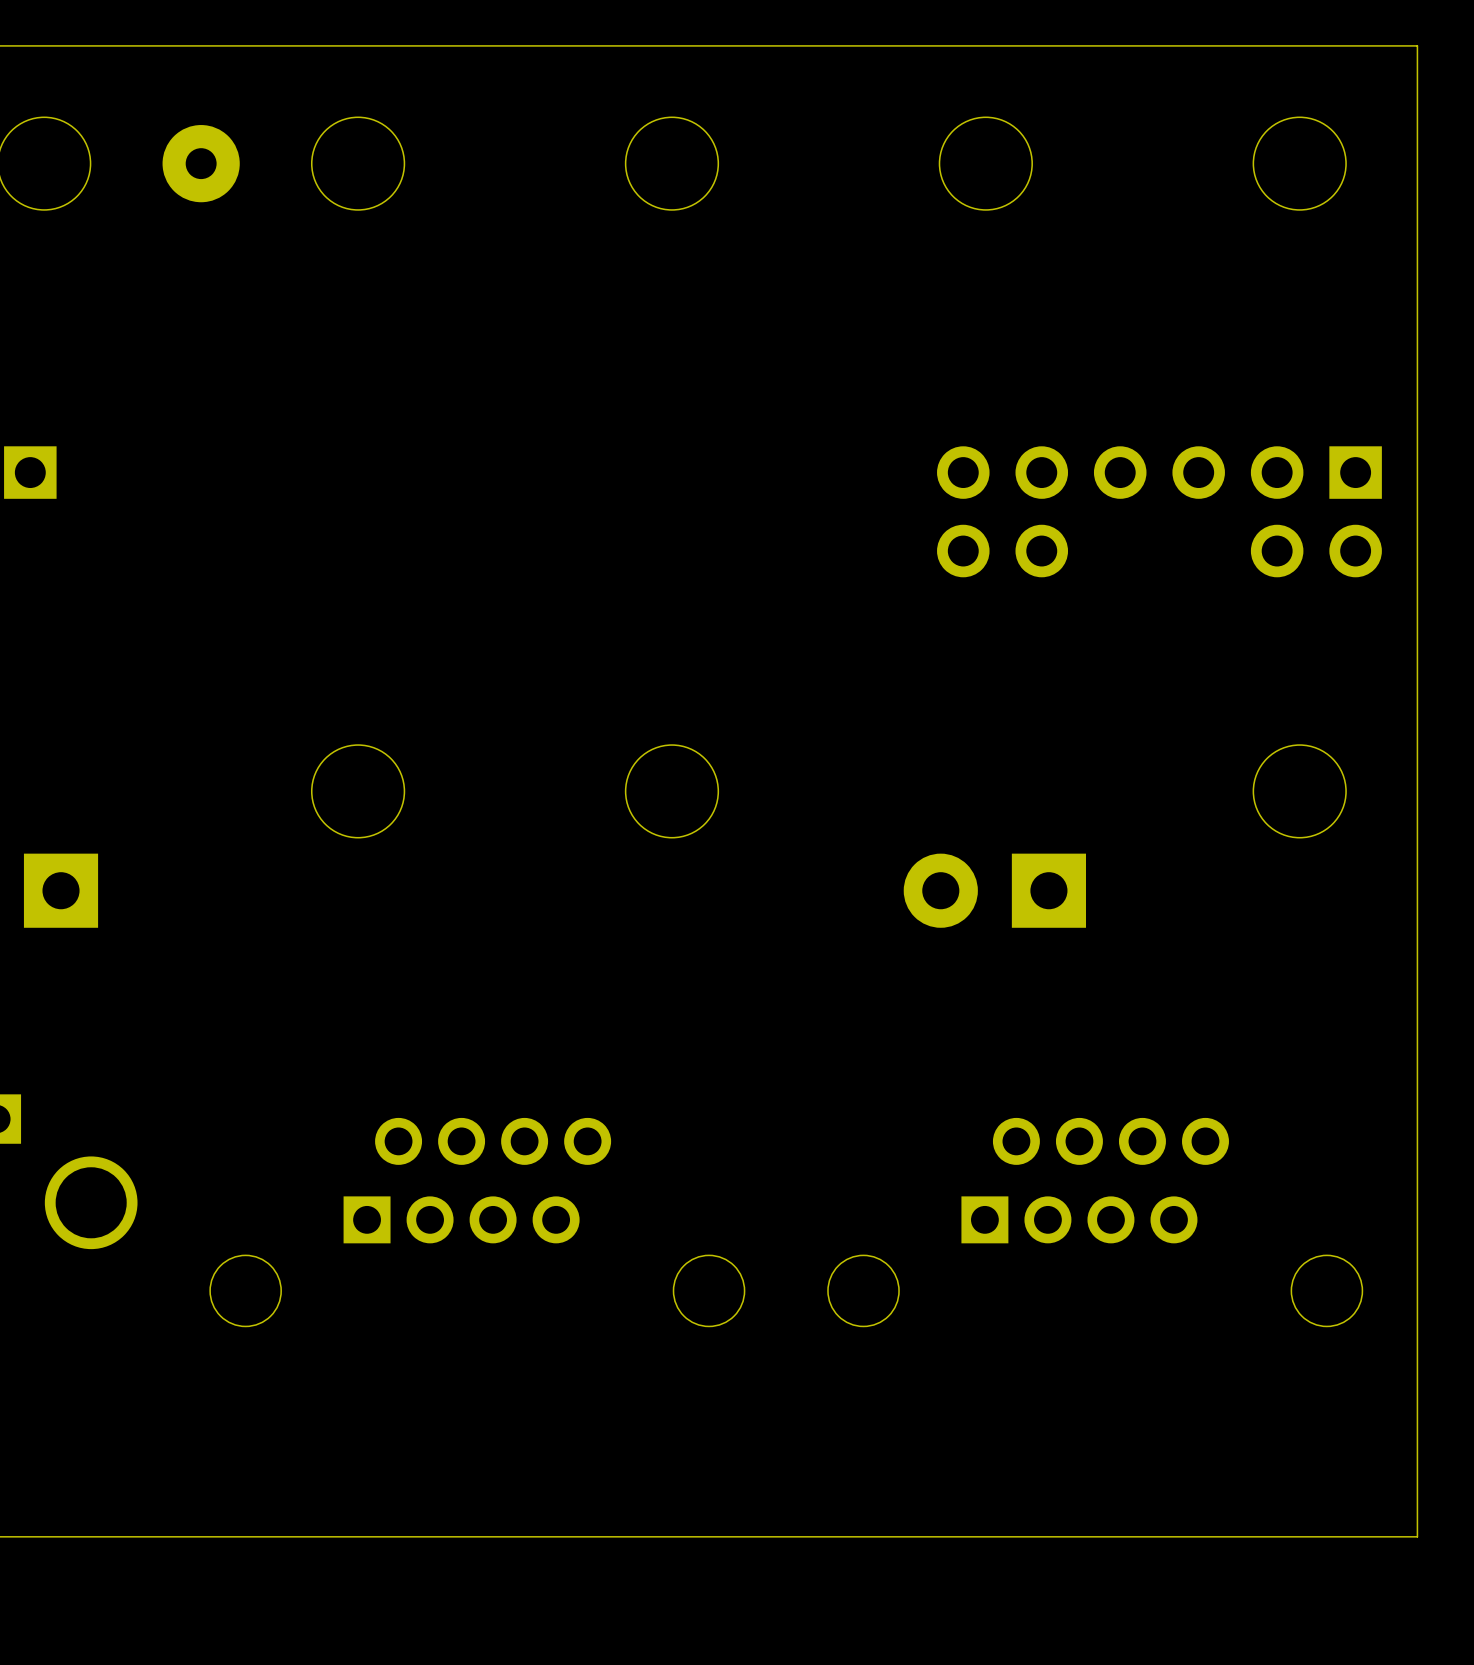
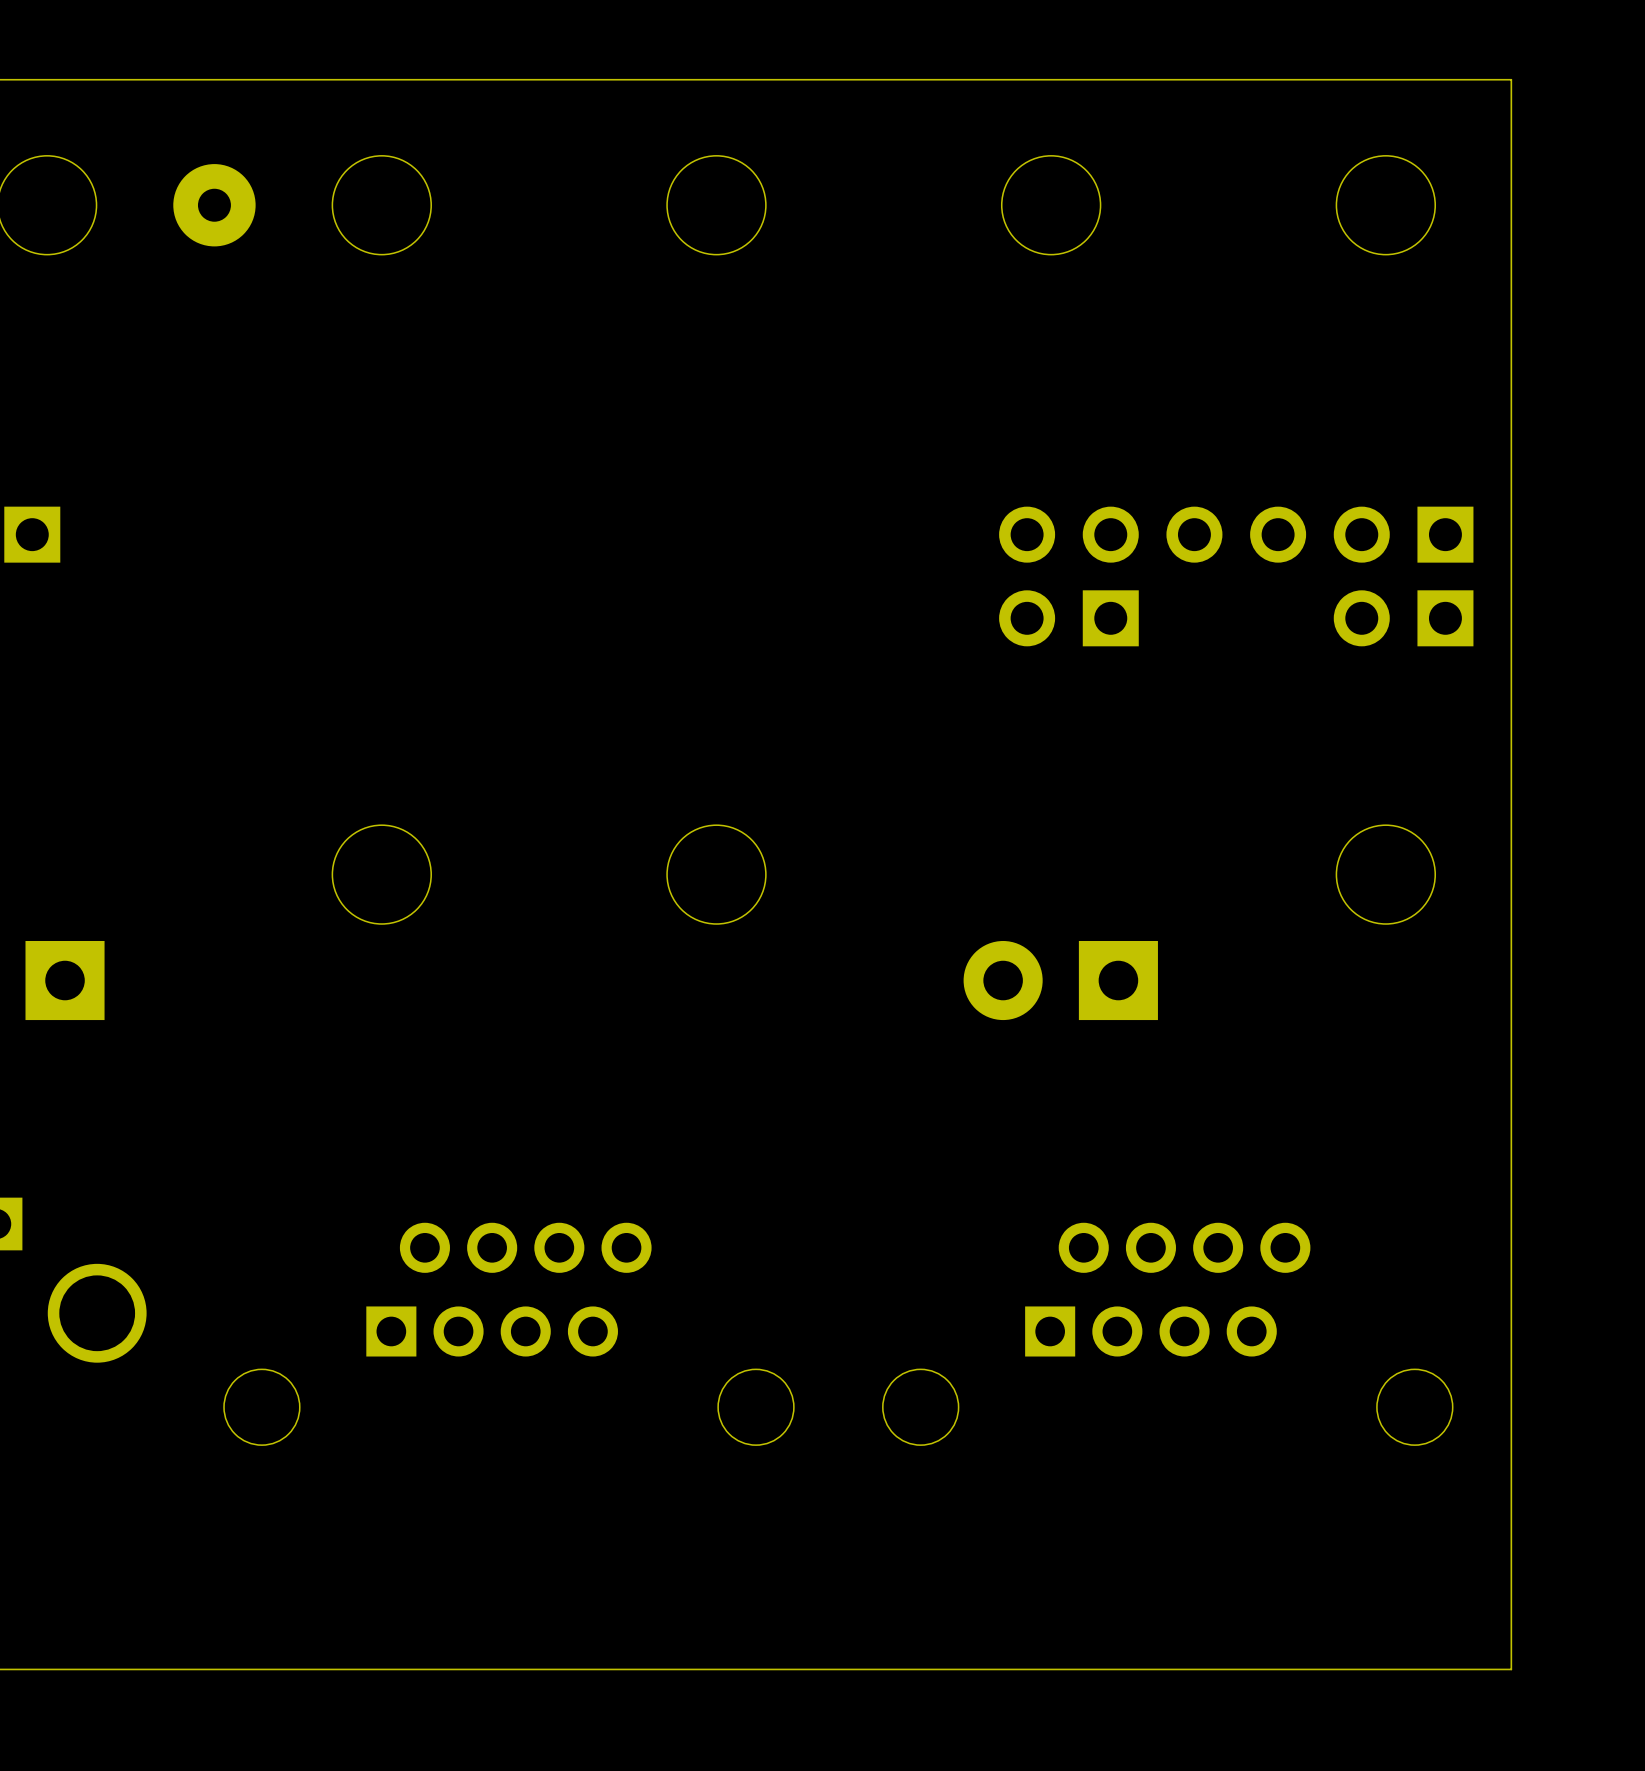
part footprint: [937, 524, 1069, 578] -> [999, 590, 1139, 647]
part footprint: [1250, 524, 1382, 578] -> [1333, 590, 1474, 647]

